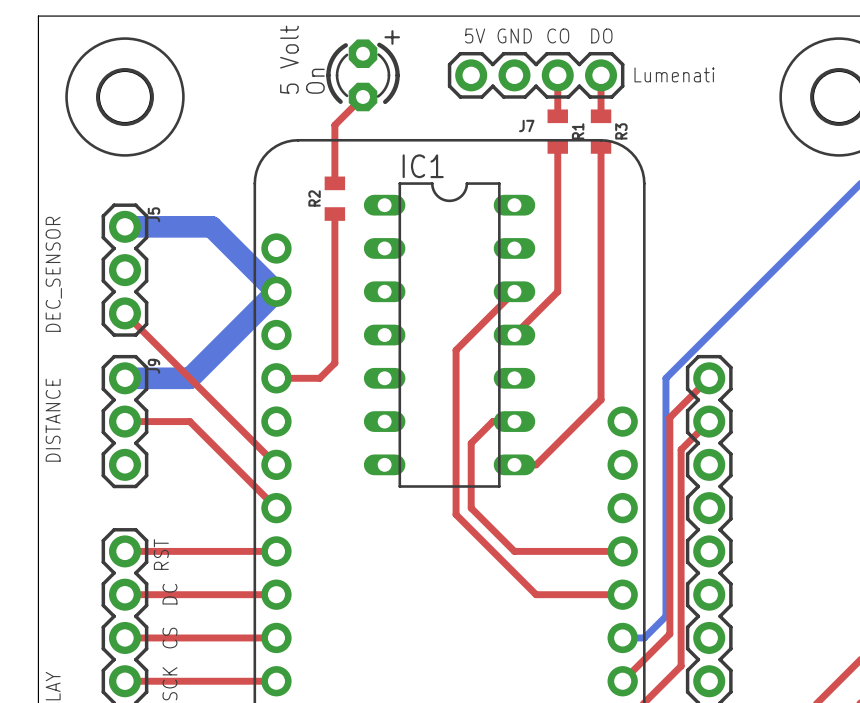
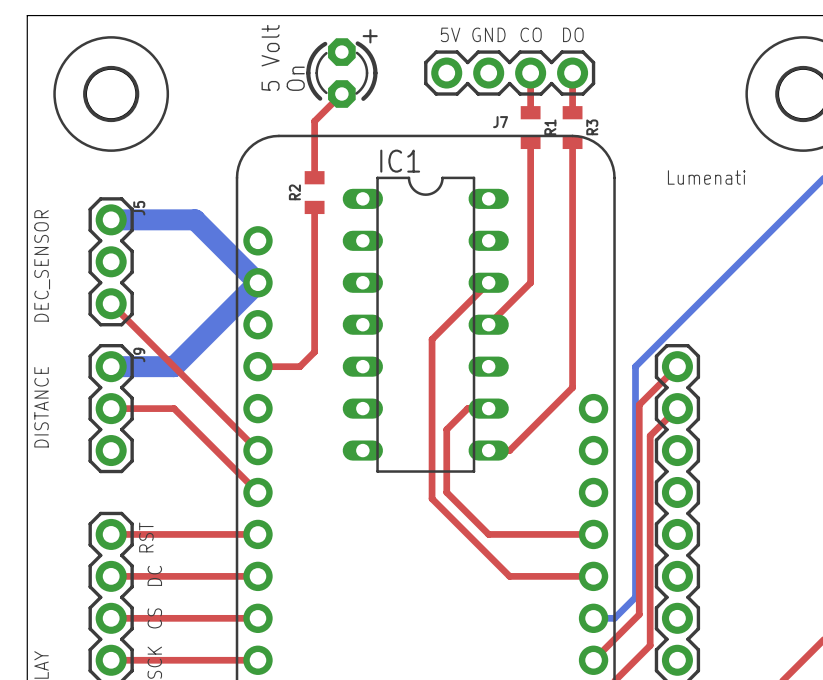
text position: Lumenati (674, 74) -> Lumenati (706, 177)

